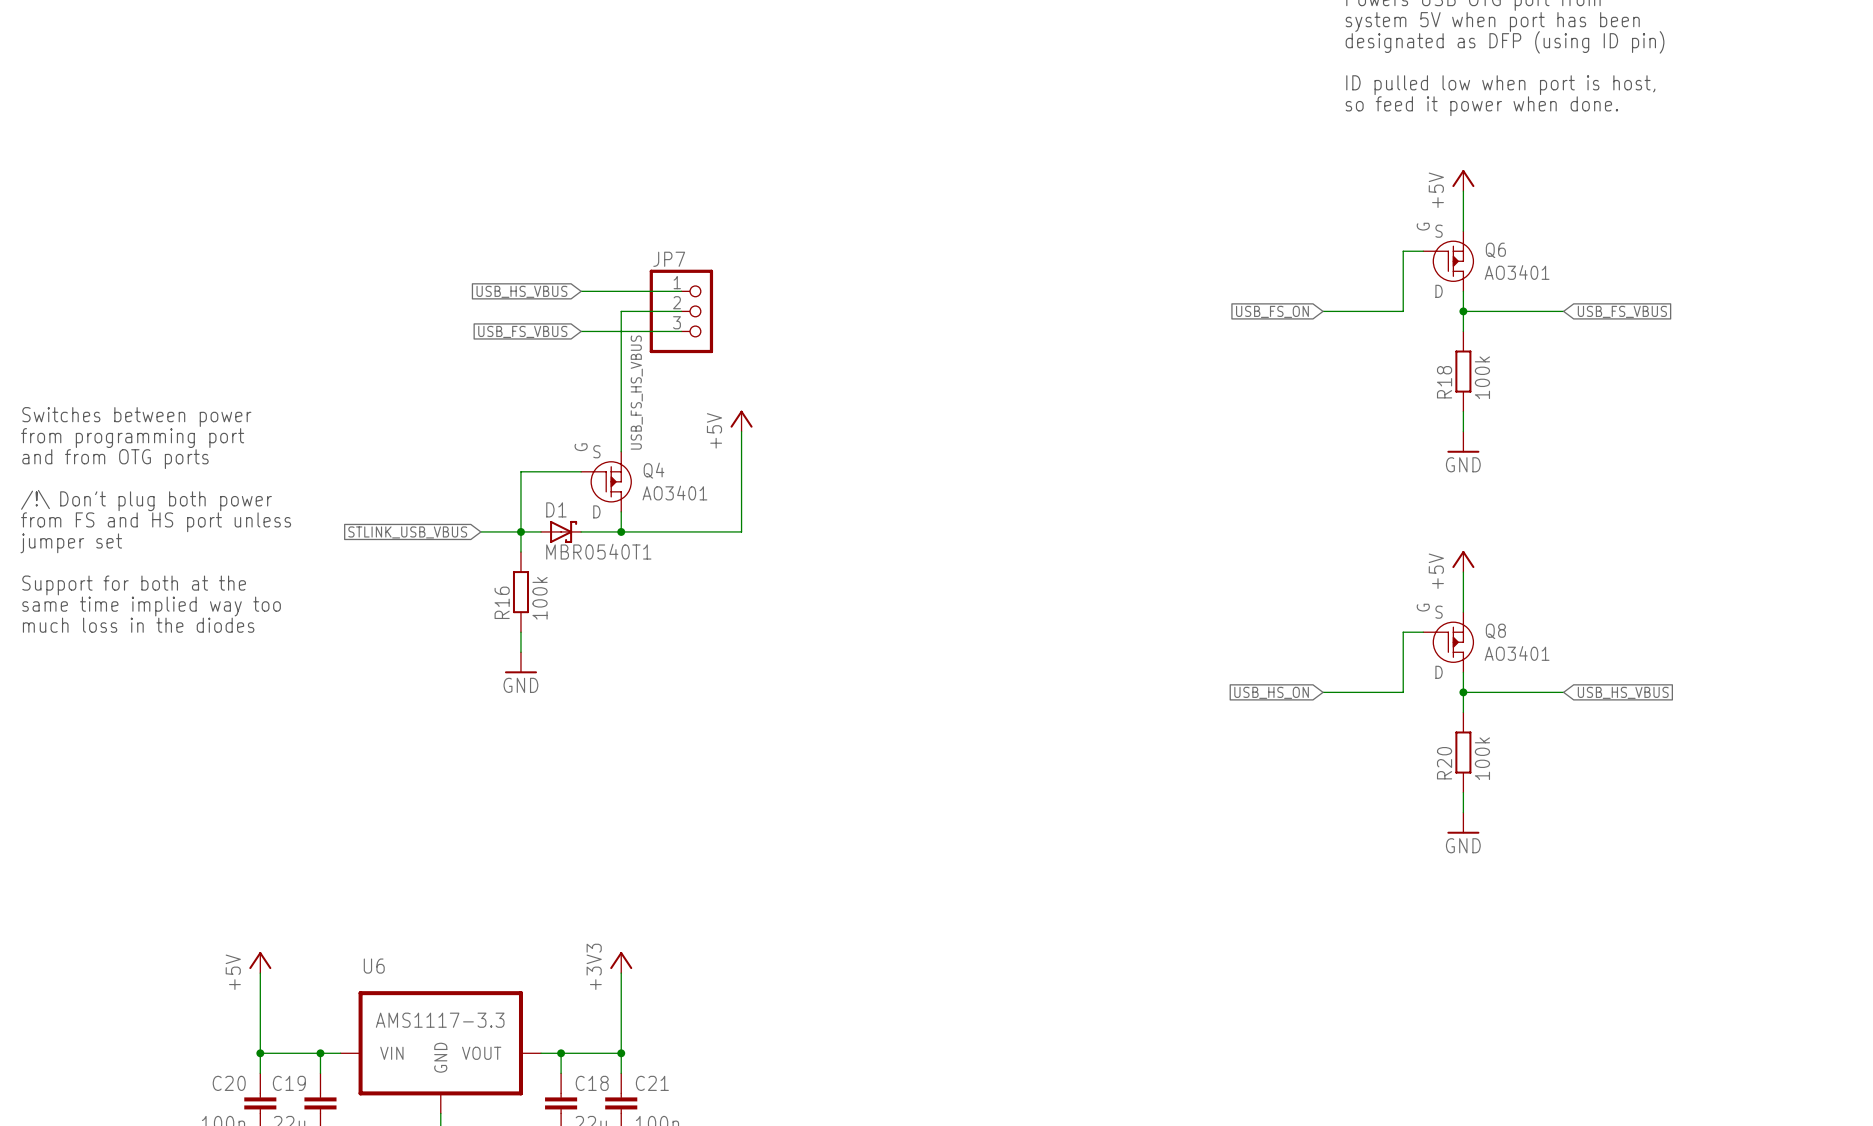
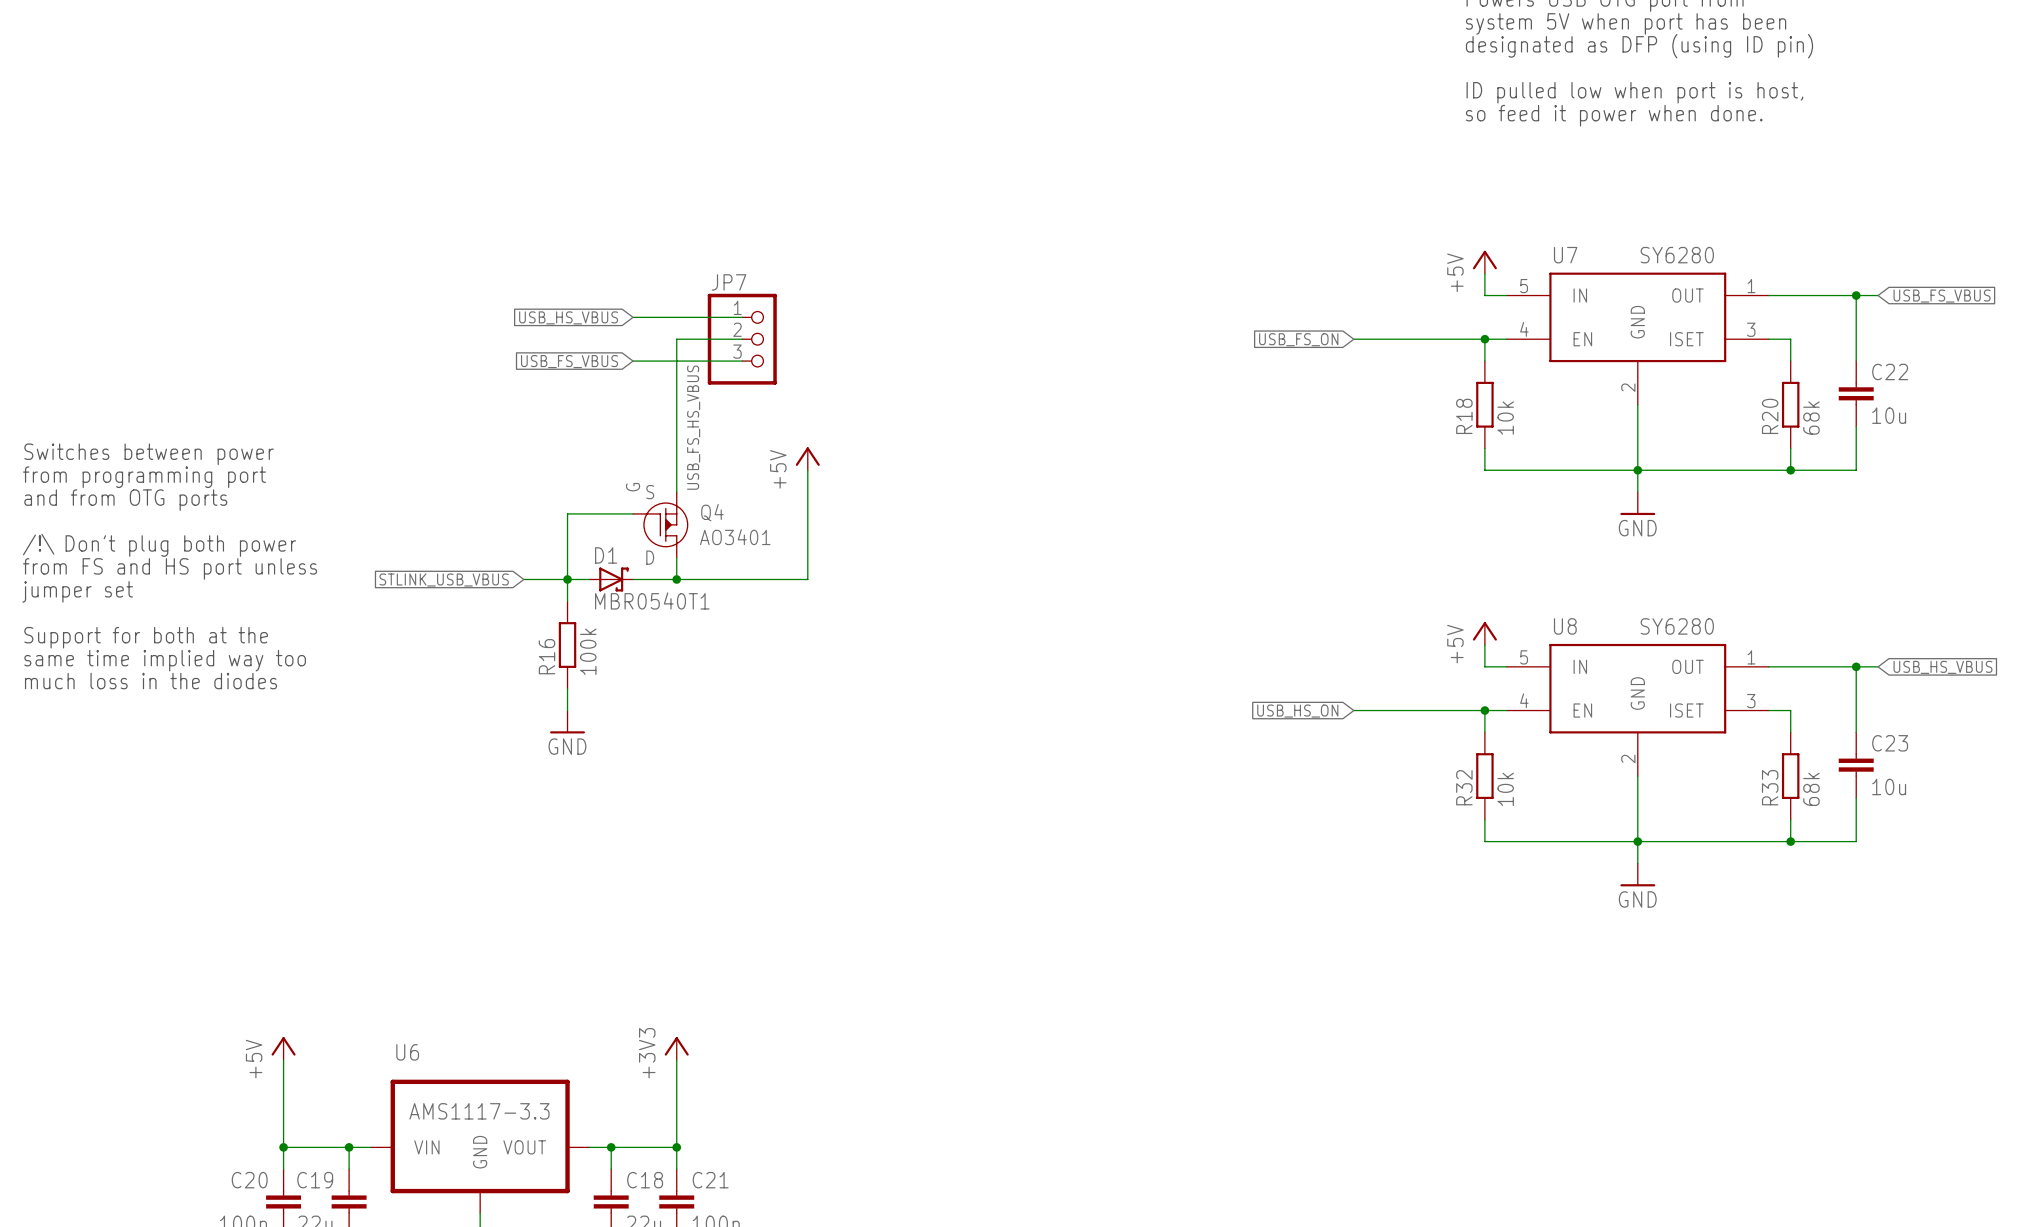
power symbol position: +5V (1463, 180) -> +5V (1484, 262)
wire: (1463, 191) (1463, 231) -> none
wire: none -> (1484, 273) (1484, 295) (1506, 295)
wire: (1423, 251) (1403, 251) (1403, 311) (1383, 311) -> none
Q6: AO3401 (1448, 261) -> none
wire: none -> (1856, 295) (1856, 361)
junction: none -> (1856, 295)
wire: (1463, 291) (1463, 331) -> none
U7: none -> (1637, 338)
wire: none -> (1353, 339) (1441, 339)
global label position: USB_FS_ON (1272, 311) -> USB_FS_ON (1298, 339)
junction: none -> (1484, 339)
wire: (1463, 311) (1563, 311) -> (1768, 295) (1878, 295)
junction: (1463, 311) -> none
global label position: USB_FS_VBUS (1622, 311) -> USB_FS_VBUS (1942, 296)
wire: none -> (1768, 339) (1790, 339) (1790, 361)
C22: none -> 10u (1856, 393)
R18 position: (1463, 371) -> (1484, 404)
wire: none -> (1637, 404) (1637, 492)
R18 value: 100k (1482, 377) -> 10k (1505, 418)
wire: none -> (1856, 426) (1856, 470) (1484, 470) (1484, 448)
wire: (1463, 411) (1463, 431) -> (1484, 339) (1484, 361)
wire: none -> (1790, 448) (1790, 470)
junction: none -> (1637, 470)
junction: none -> (1790, 470)
power symbol position: GND (1463, 442) -> GND (1637, 503)
power symbol position: +5V (1463, 561) -> +5V (1484, 633)
wire: (1463, 572) (1463, 612) -> none
wire: none -> (1484, 645) (1484, 666) (1506, 666)
wire: none -> (1856, 666) (1856, 732)
junction: none -> (1856, 666)
wire: (1423, 632) (1403, 632) (1403, 692) (1323, 692) -> none
Q8: AO3401 (1448, 642) -> none
U8: none -> (1637, 709)
wire: none -> (1353, 710) (1506, 710)
junction: none -> (1484, 710)
wire: none -> (1768, 710) (1790, 710) (1790, 732)
wire: (1463, 672) (1463, 712) -> none
global label position: USB_HS_ON (1271, 692) -> USB_HS_ON (1297, 711)
wire: (1463, 692) (1563, 692) -> (1768, 666) (1878, 666)
junction: (1463, 692) -> none
global label position: USB_HS_VBUS (1623, 692) -> USB_HS_VBUS (1943, 667)
C23: none -> 10u (1856, 765)
R32: none -> 10k (1484, 776)
wire: none -> (1637, 776) (1637, 863)
R33: none -> 68k (1790, 776)
wire: none -> (1856, 797) (1856, 841) (1484, 841) (1484, 819)
R20 position: (1463, 752) -> (1790, 404)
wire: none -> (1790, 819) (1790, 841)
R20 value: 100k (1482, 758) -> 68k (1811, 418)
junction: none -> (1637, 841)
junction: none -> (1790, 841)
wire: (1463, 792) (1463, 812) -> (1484, 710) (1484, 732)
power symbol position: GND (1463, 823) -> GND (1637, 874)

